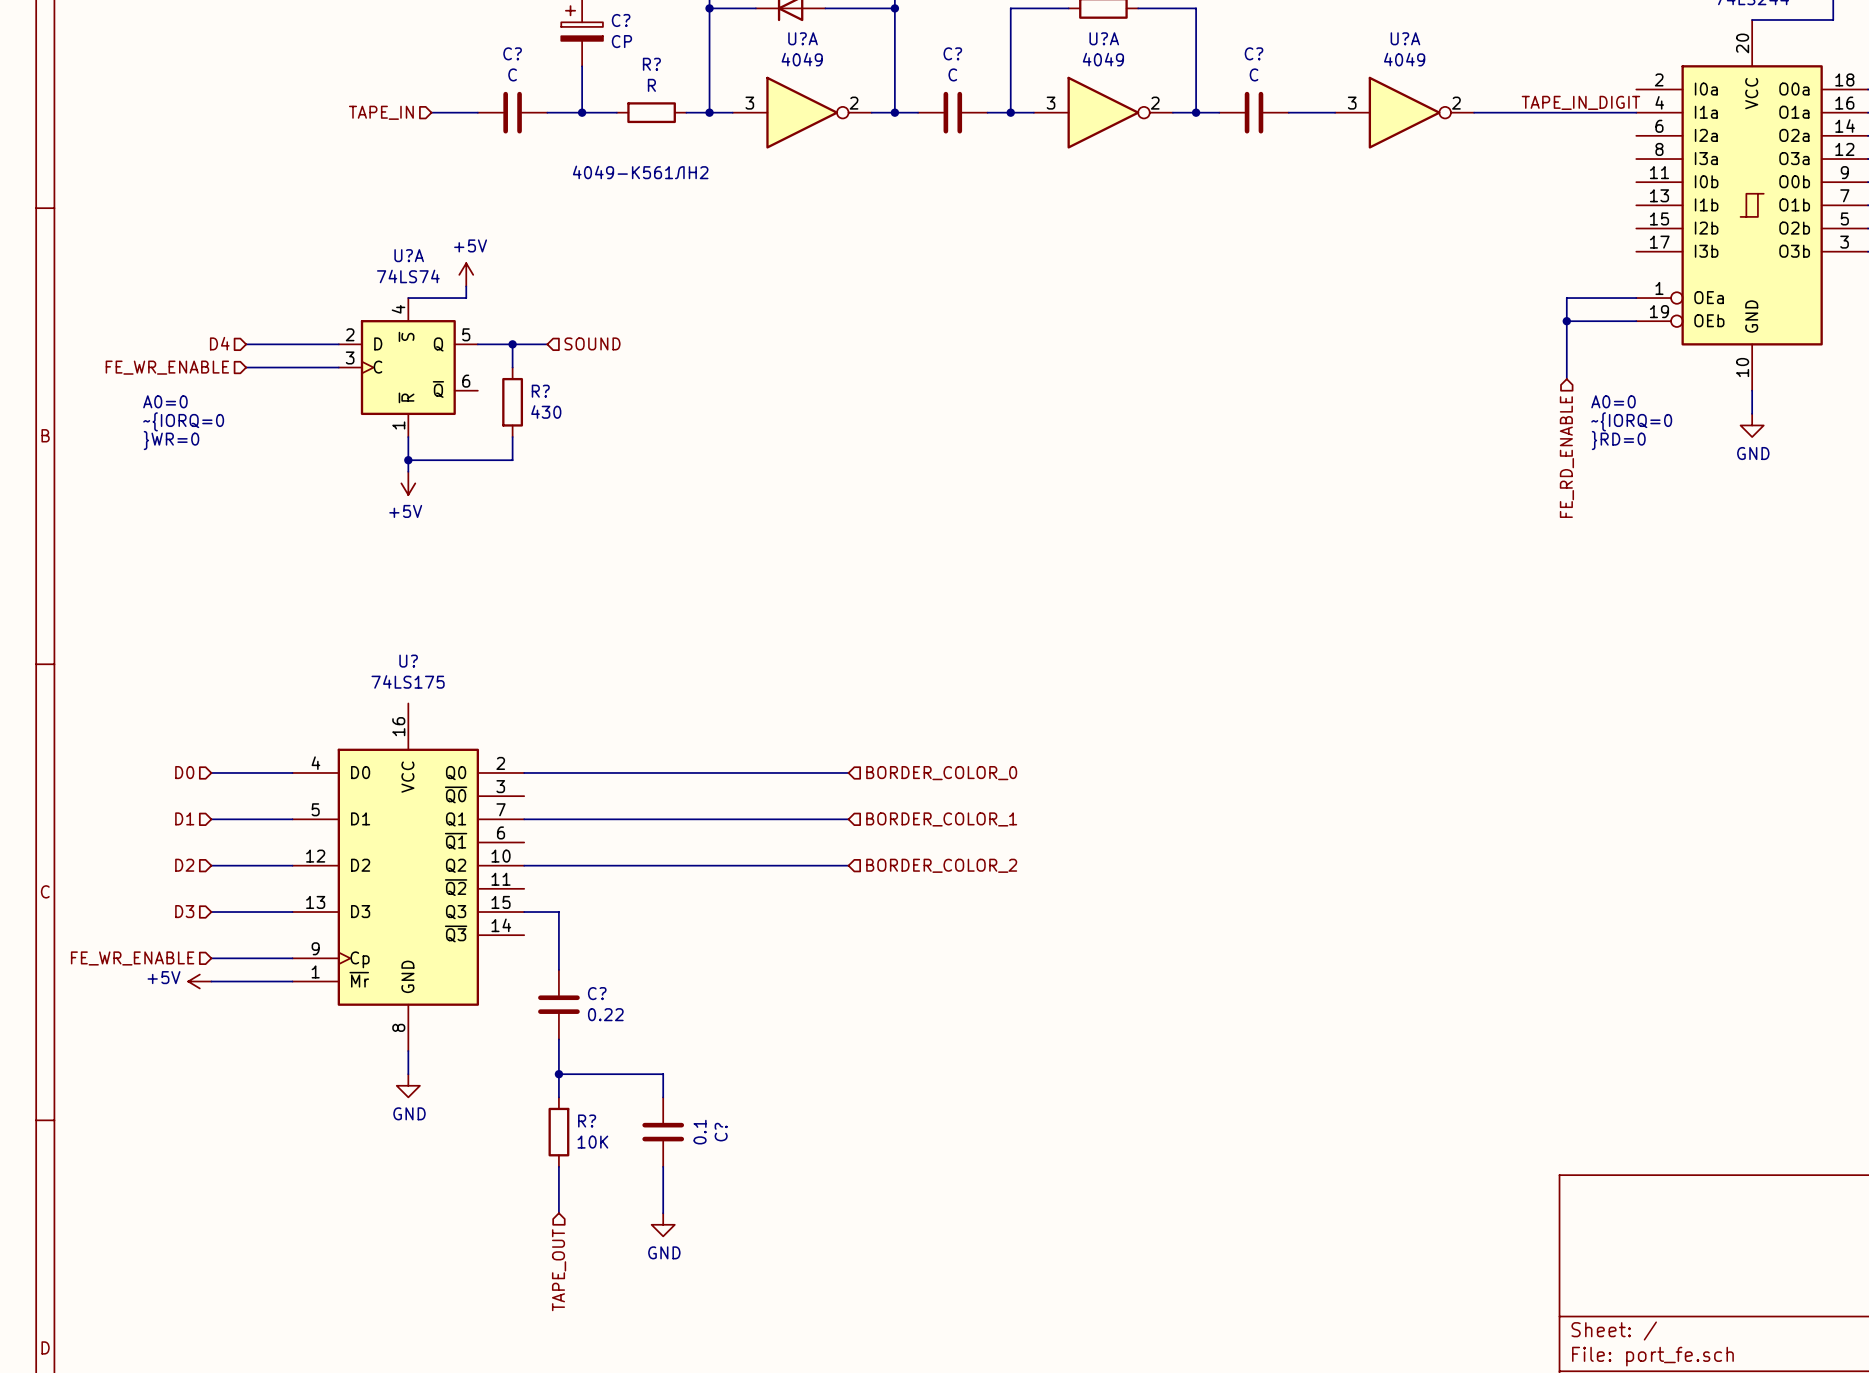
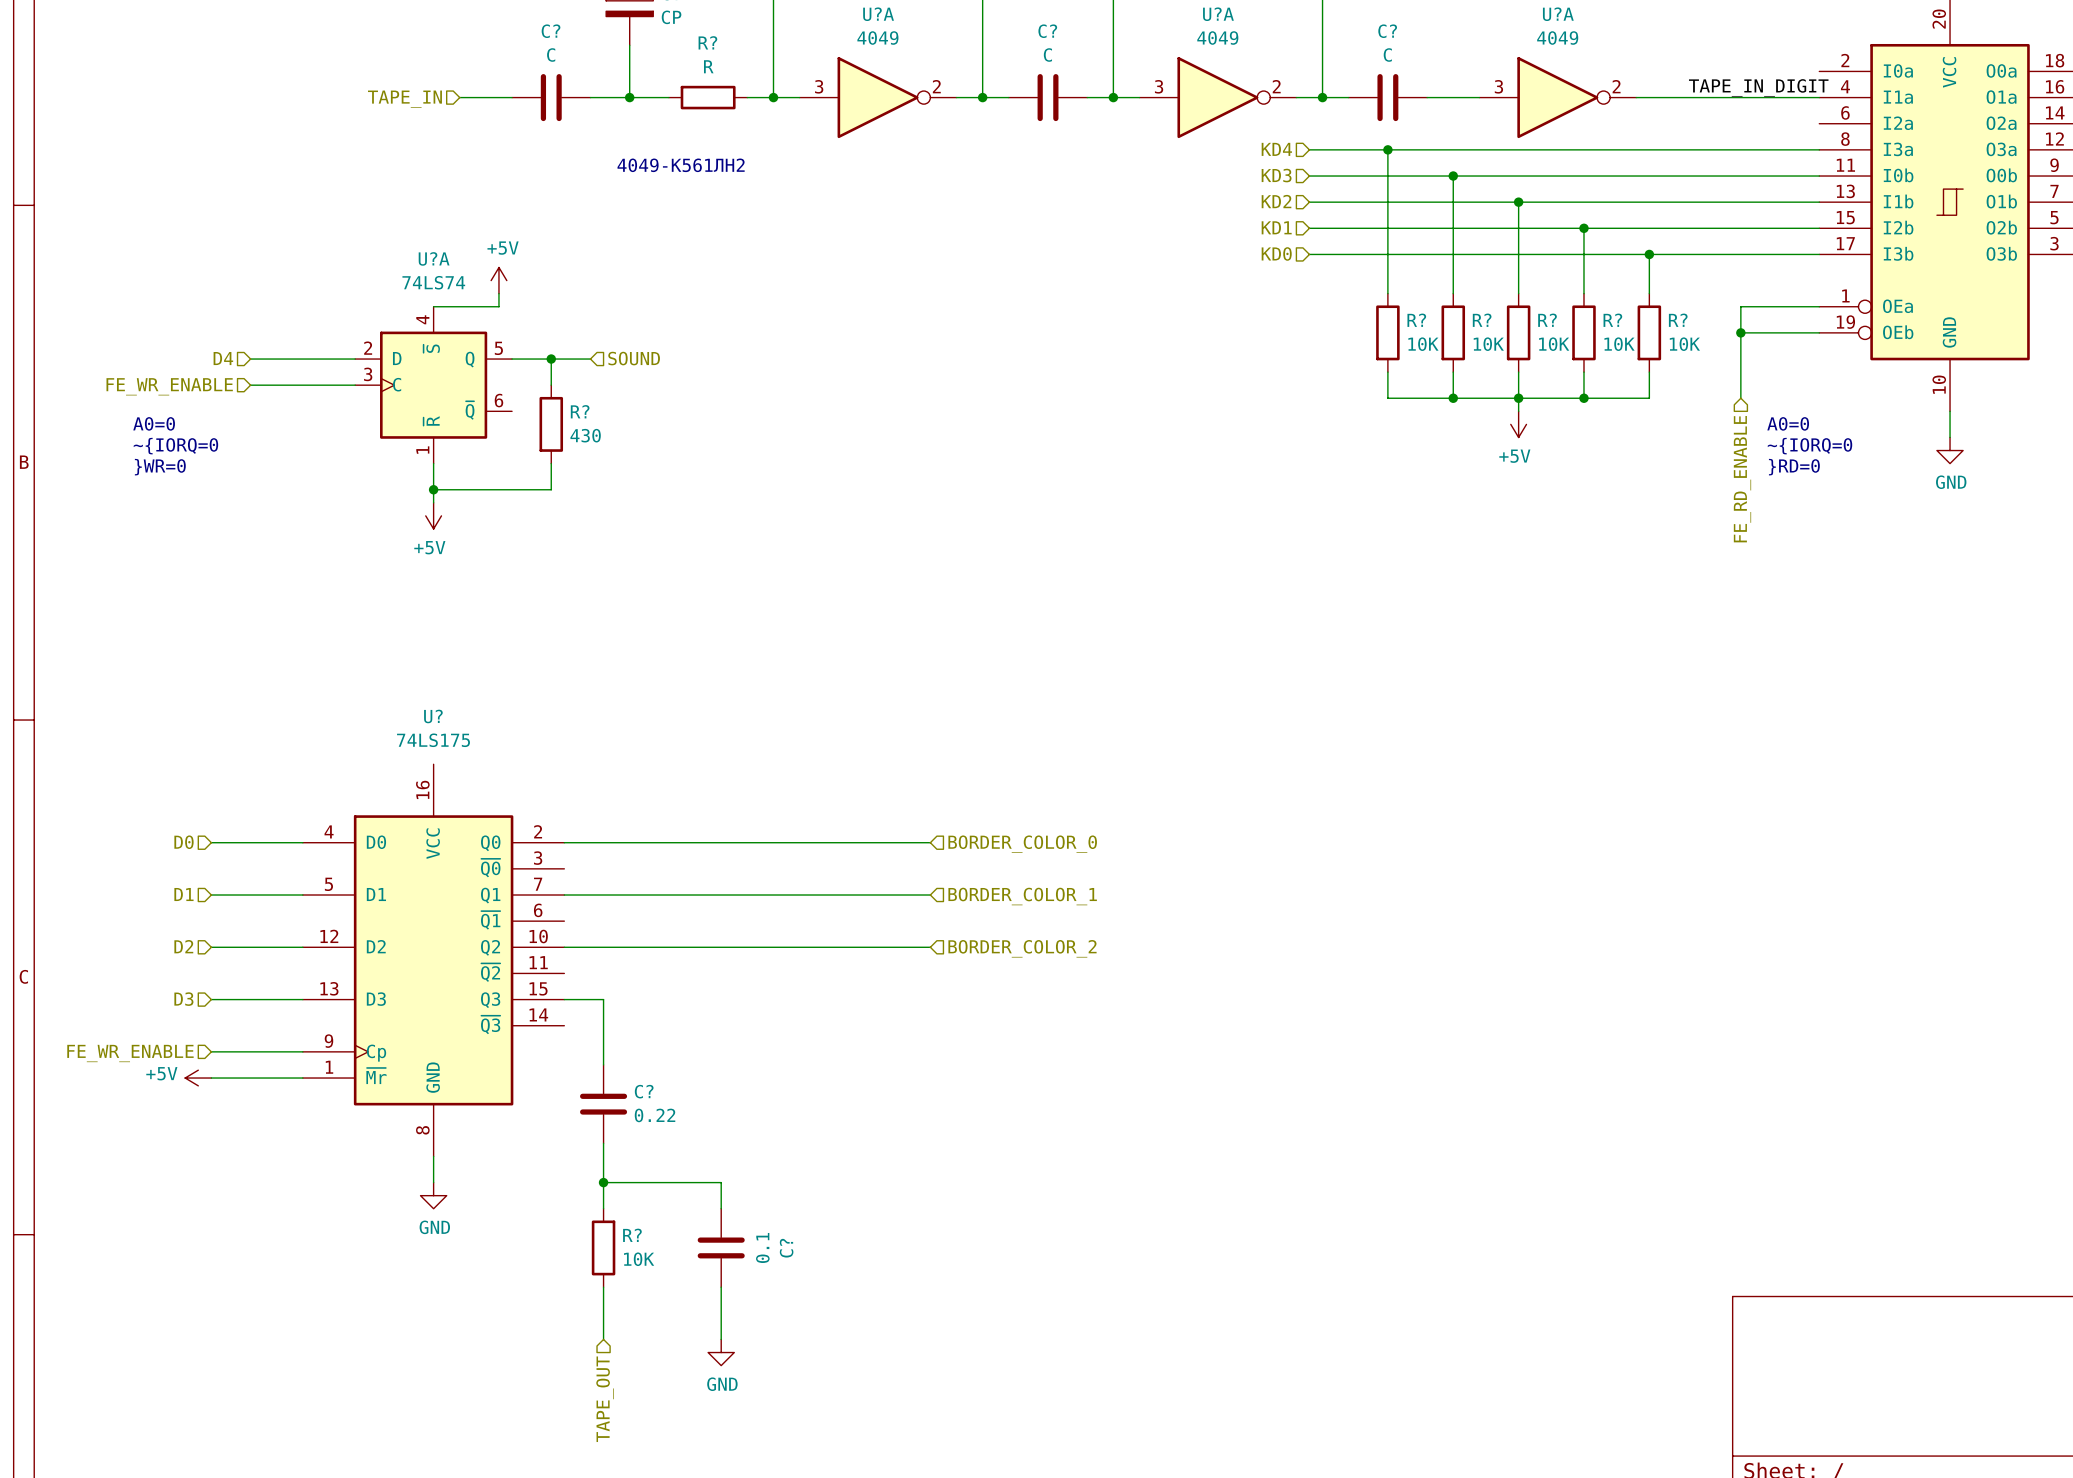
hierarchical label: none -> KD4 (1276, 149)
wire: none -> (1309, 149) (1819, 149)
wire: none -> (1387, 149) (1387, 293)
junction: none -> (1387, 149)
hierarchical label: none -> KD3 (1276, 175)
wire: none -> (1309, 176) (1819, 176)
wire: none -> (1453, 176) (1453, 293)
junction: none -> (1453, 176)
hierarchical label: none -> KD2 (1276, 201)
wire: none -> (1309, 202) (1819, 202)
wire: none -> (1518, 202) (1518, 293)
junction: none -> (1518, 202)
hierarchical label: none -> KD1 (1276, 227)
wire: none -> (1309, 228) (1819, 228)
wire: none -> (1583, 228) (1583, 293)
junction: none -> (1583, 228)
hierarchical label: none -> KD0 (1276, 253)
wire: none -> (1309, 254) (1819, 254)
wire: none -> (1649, 254) (1649, 293)
junction: none -> (1649, 254)
R?: none -> 10K (1387, 332)
R?: none -> 10K (1453, 332)
R?: none -> 10K (1518, 332)
R?: none -> 10K (1583, 332)
R?: none -> 10K (1649, 332)
wire: none -> (1387, 372) (1387, 398) (1649, 398) (1649, 372)
wire: none -> (1453, 372) (1453, 398)
wire: none -> (1518, 372) (1518, 411)
wire: none -> (1583, 372) (1583, 398)
junction: none -> (1453, 398)
junction: none -> (1518, 398)
junction: none -> (1583, 398)
power symbol: none -> +5V (1518, 424)

